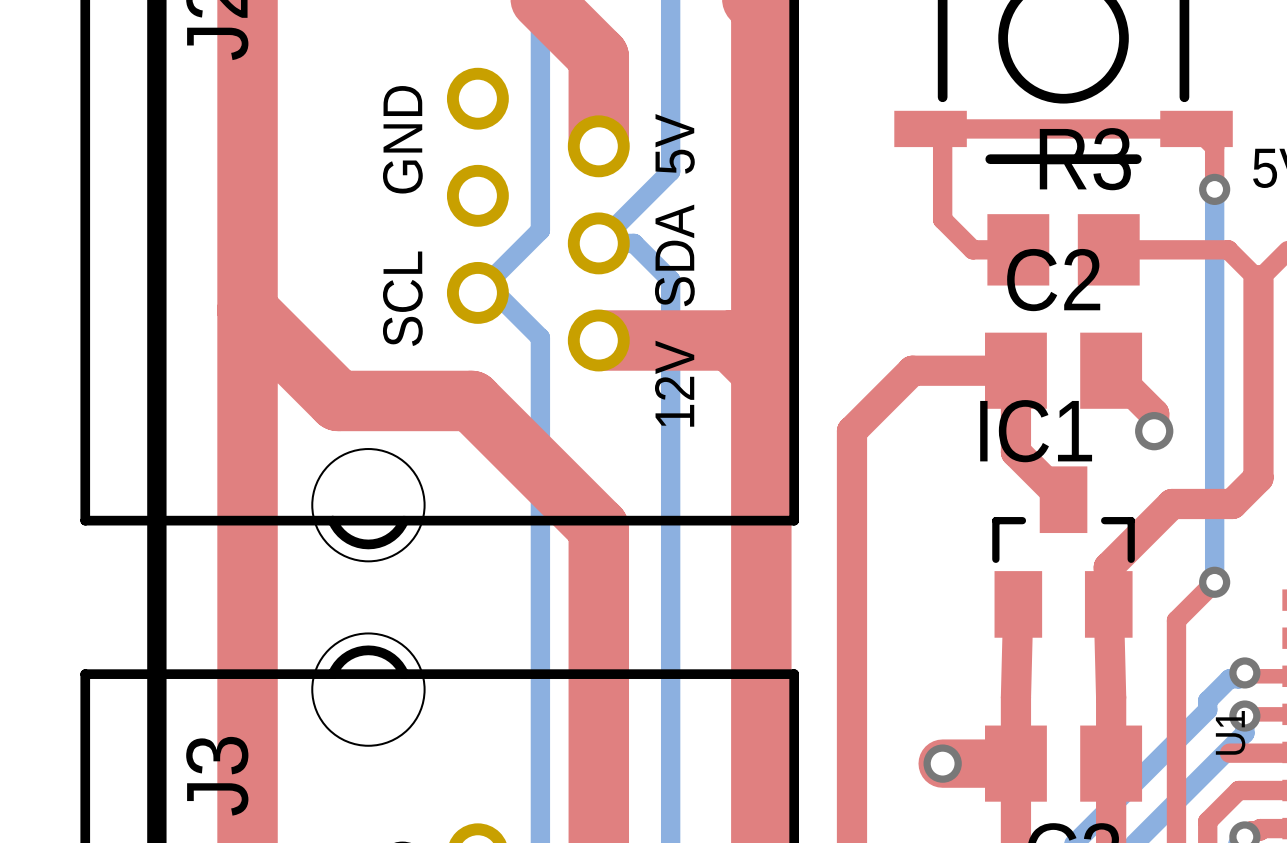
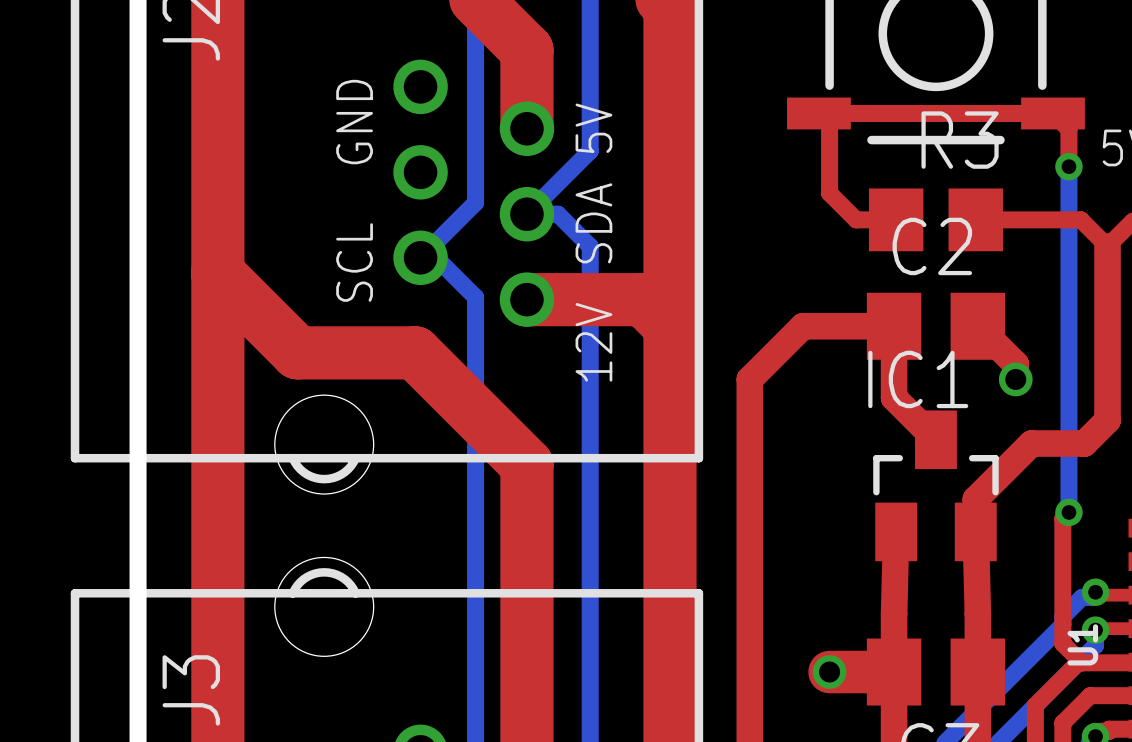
top track: (1207, 589) (1176, 620) (1176, 801) -> (1062, 518) (1062, 643) (1082, 662) (1078, 662) (1035, 705)

